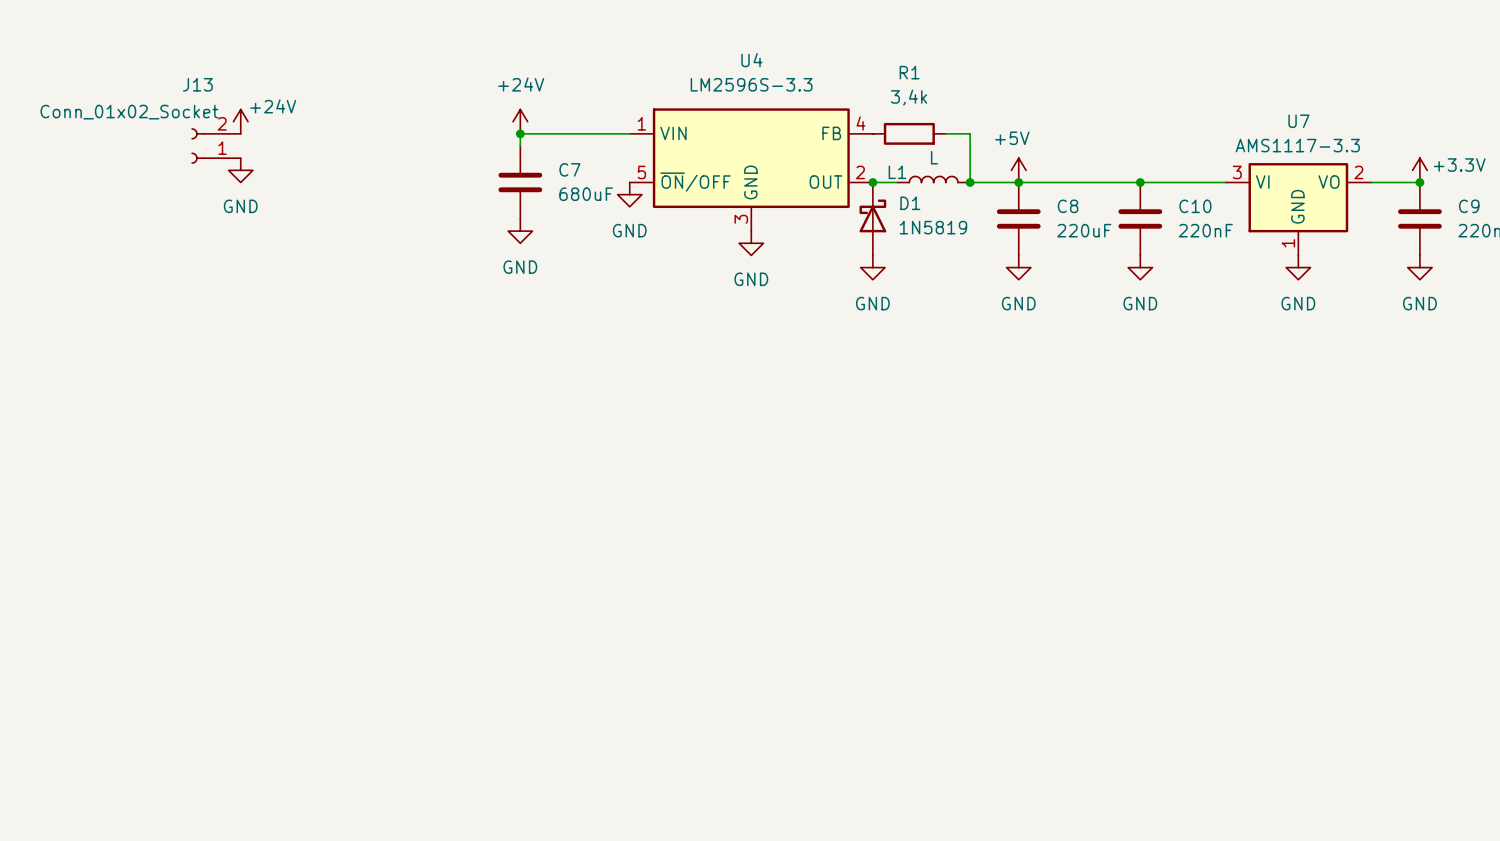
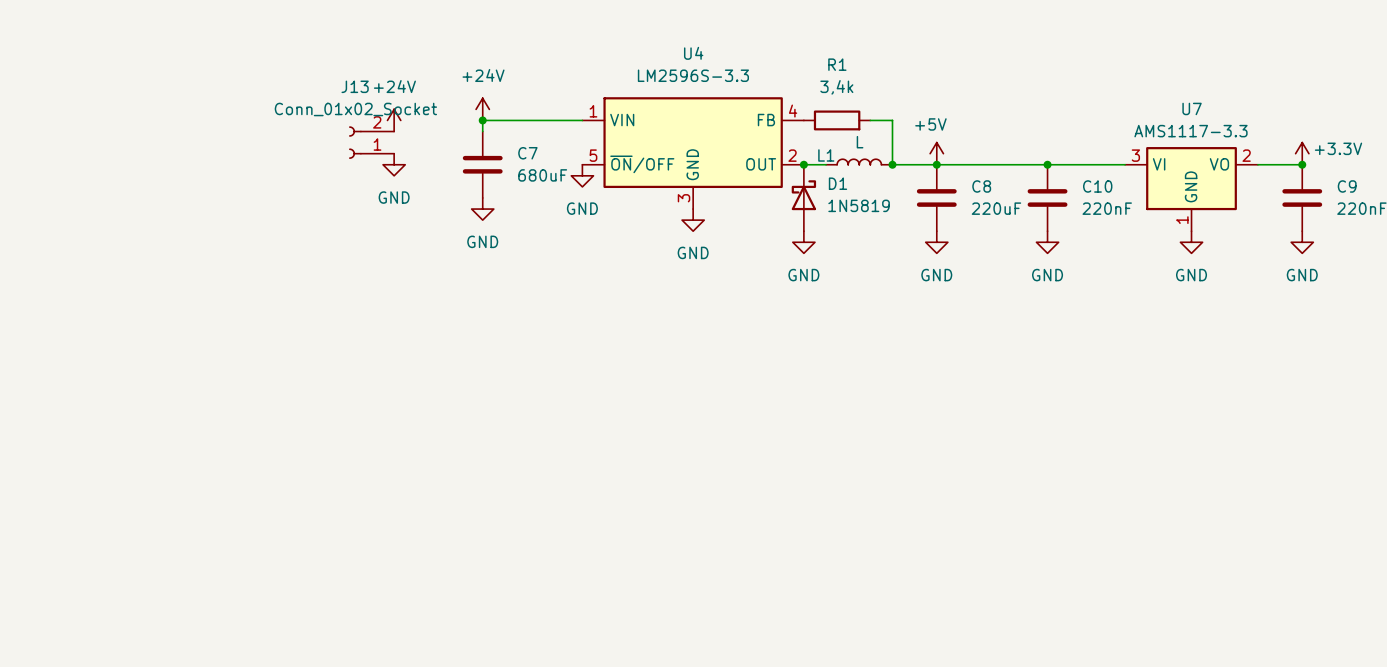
power symbol text position: +24V (273, 106) -> +24V (394, 86)
J13 value position: Conn_01x02_Socket (129, 112) -> Conn_01x02_Socket (355, 109)
power symbol position: +24V (240, 121) -> +24V (394, 120)
J13 position: (216, 146) -> (371, 142)
power symbol position: GND (240, 170) -> GND (394, 164)

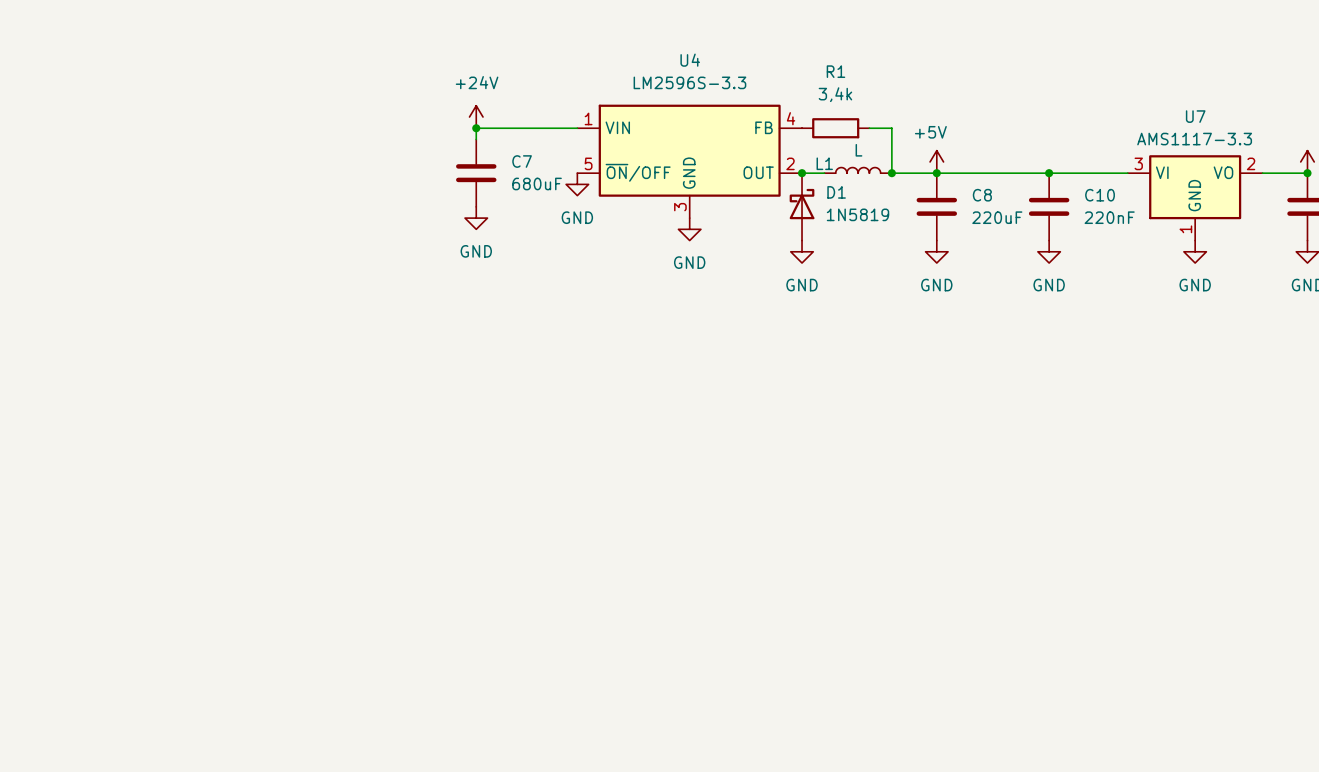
power symbol: +24V (394, 120) -> none
J13: Conn_01x02_Socket (371, 142) -> none
power symbol: GND (394, 164) -> none

